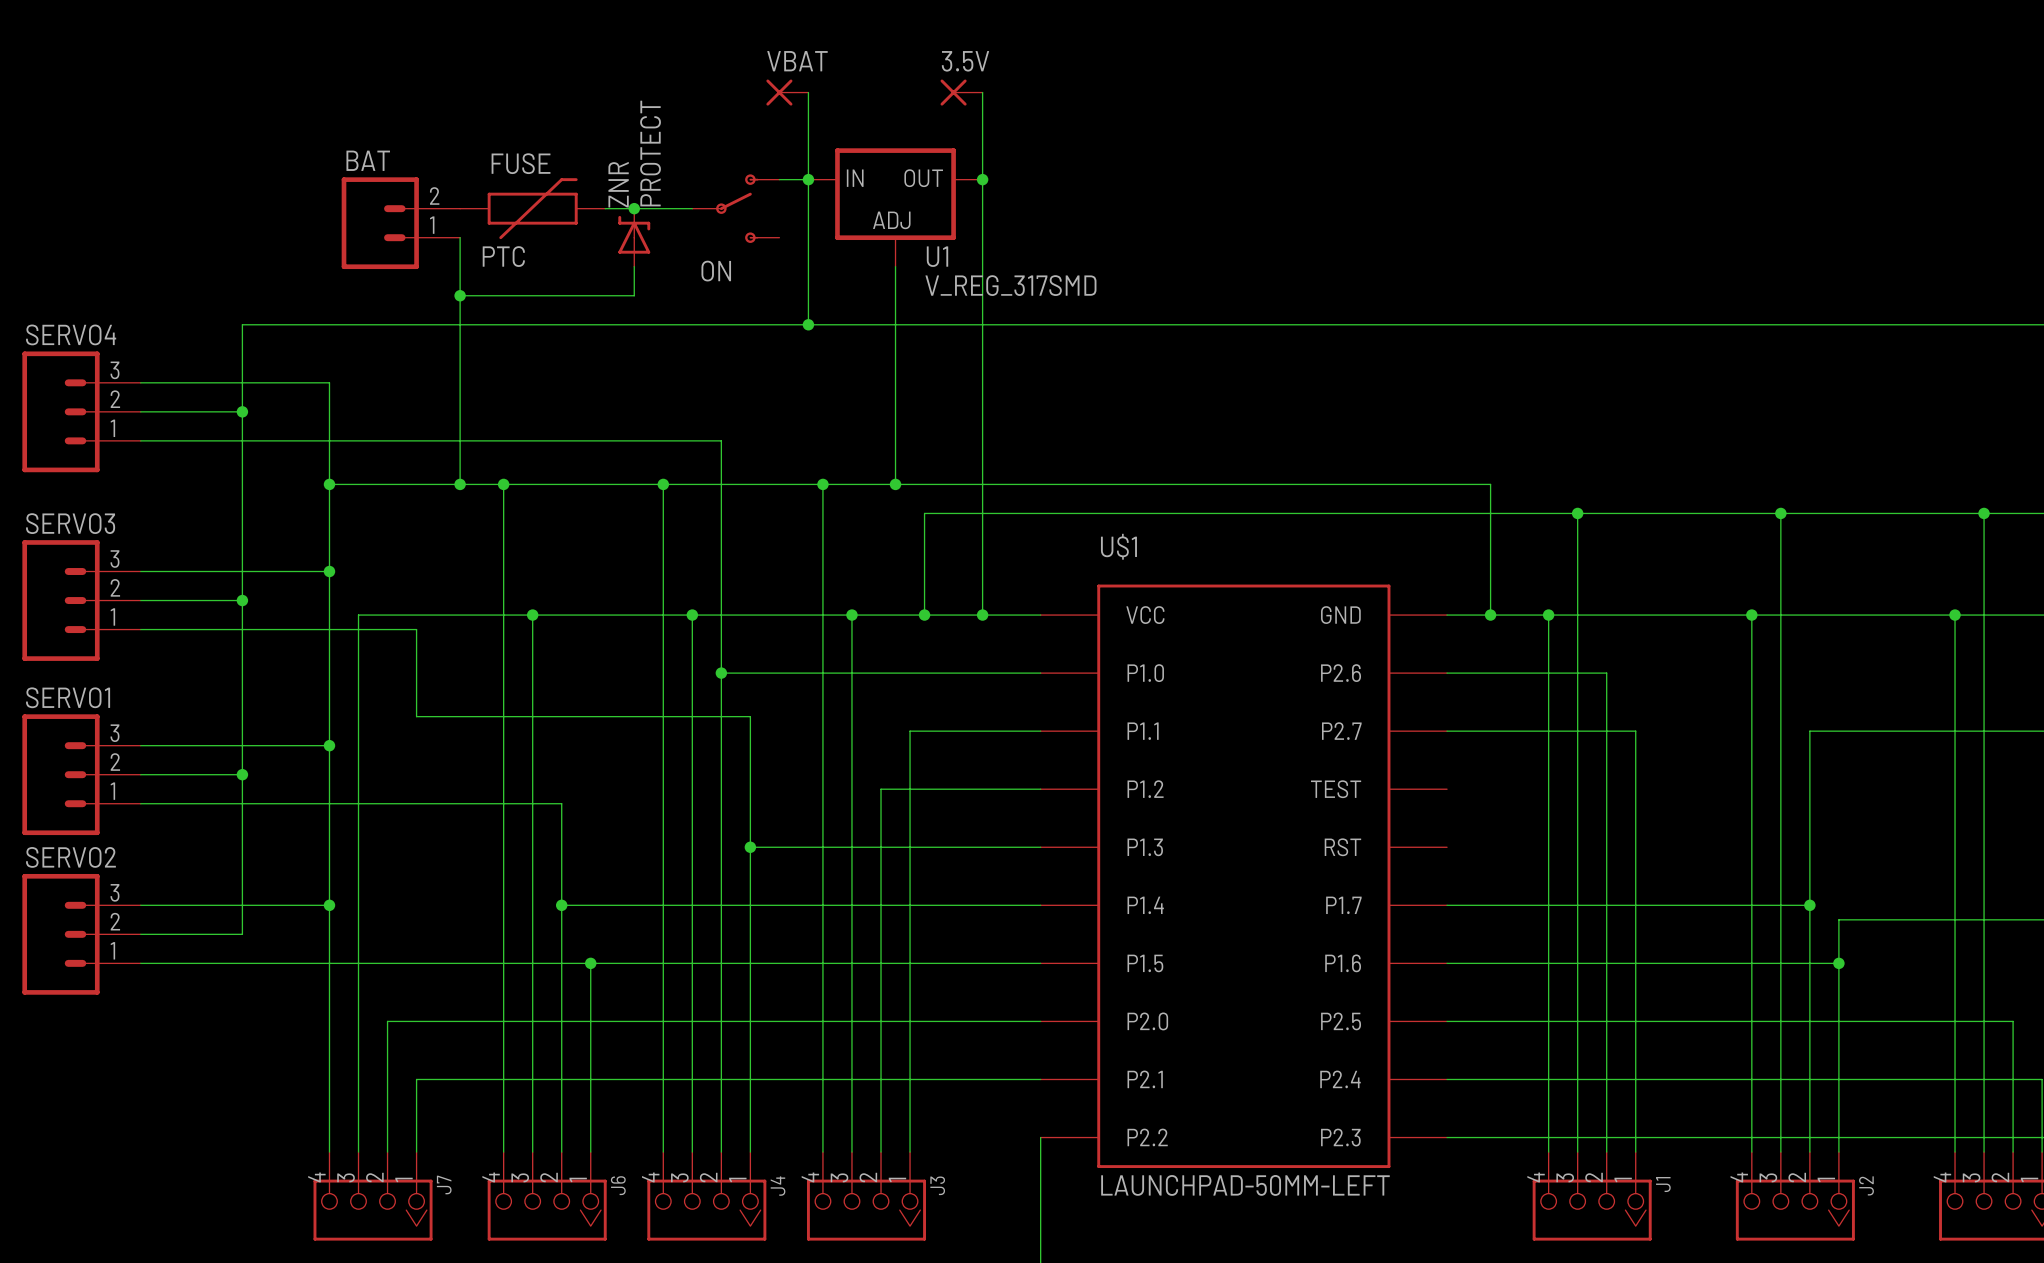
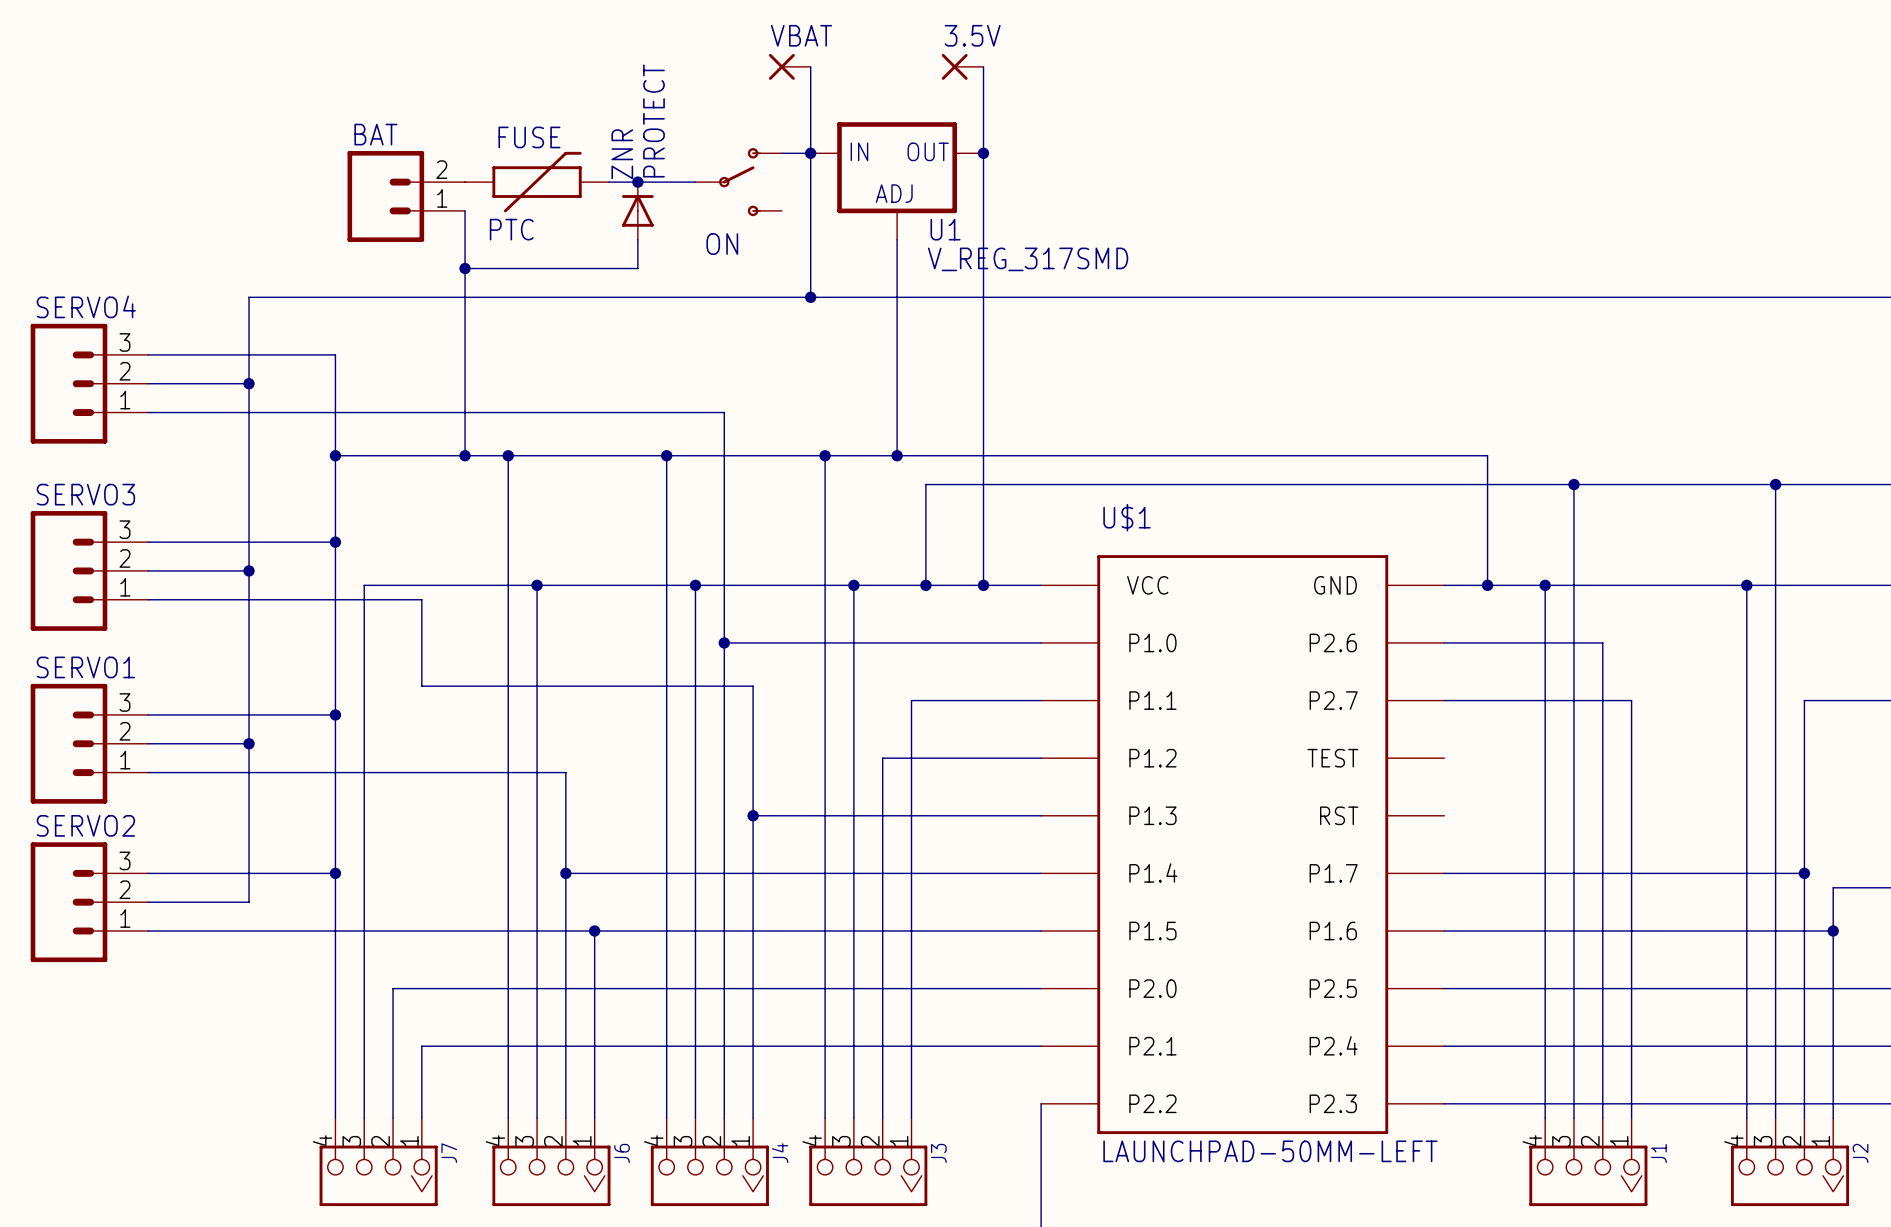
ZNR symbol: [618, 208, 651, 267] -> [622, 182, 654, 240]

